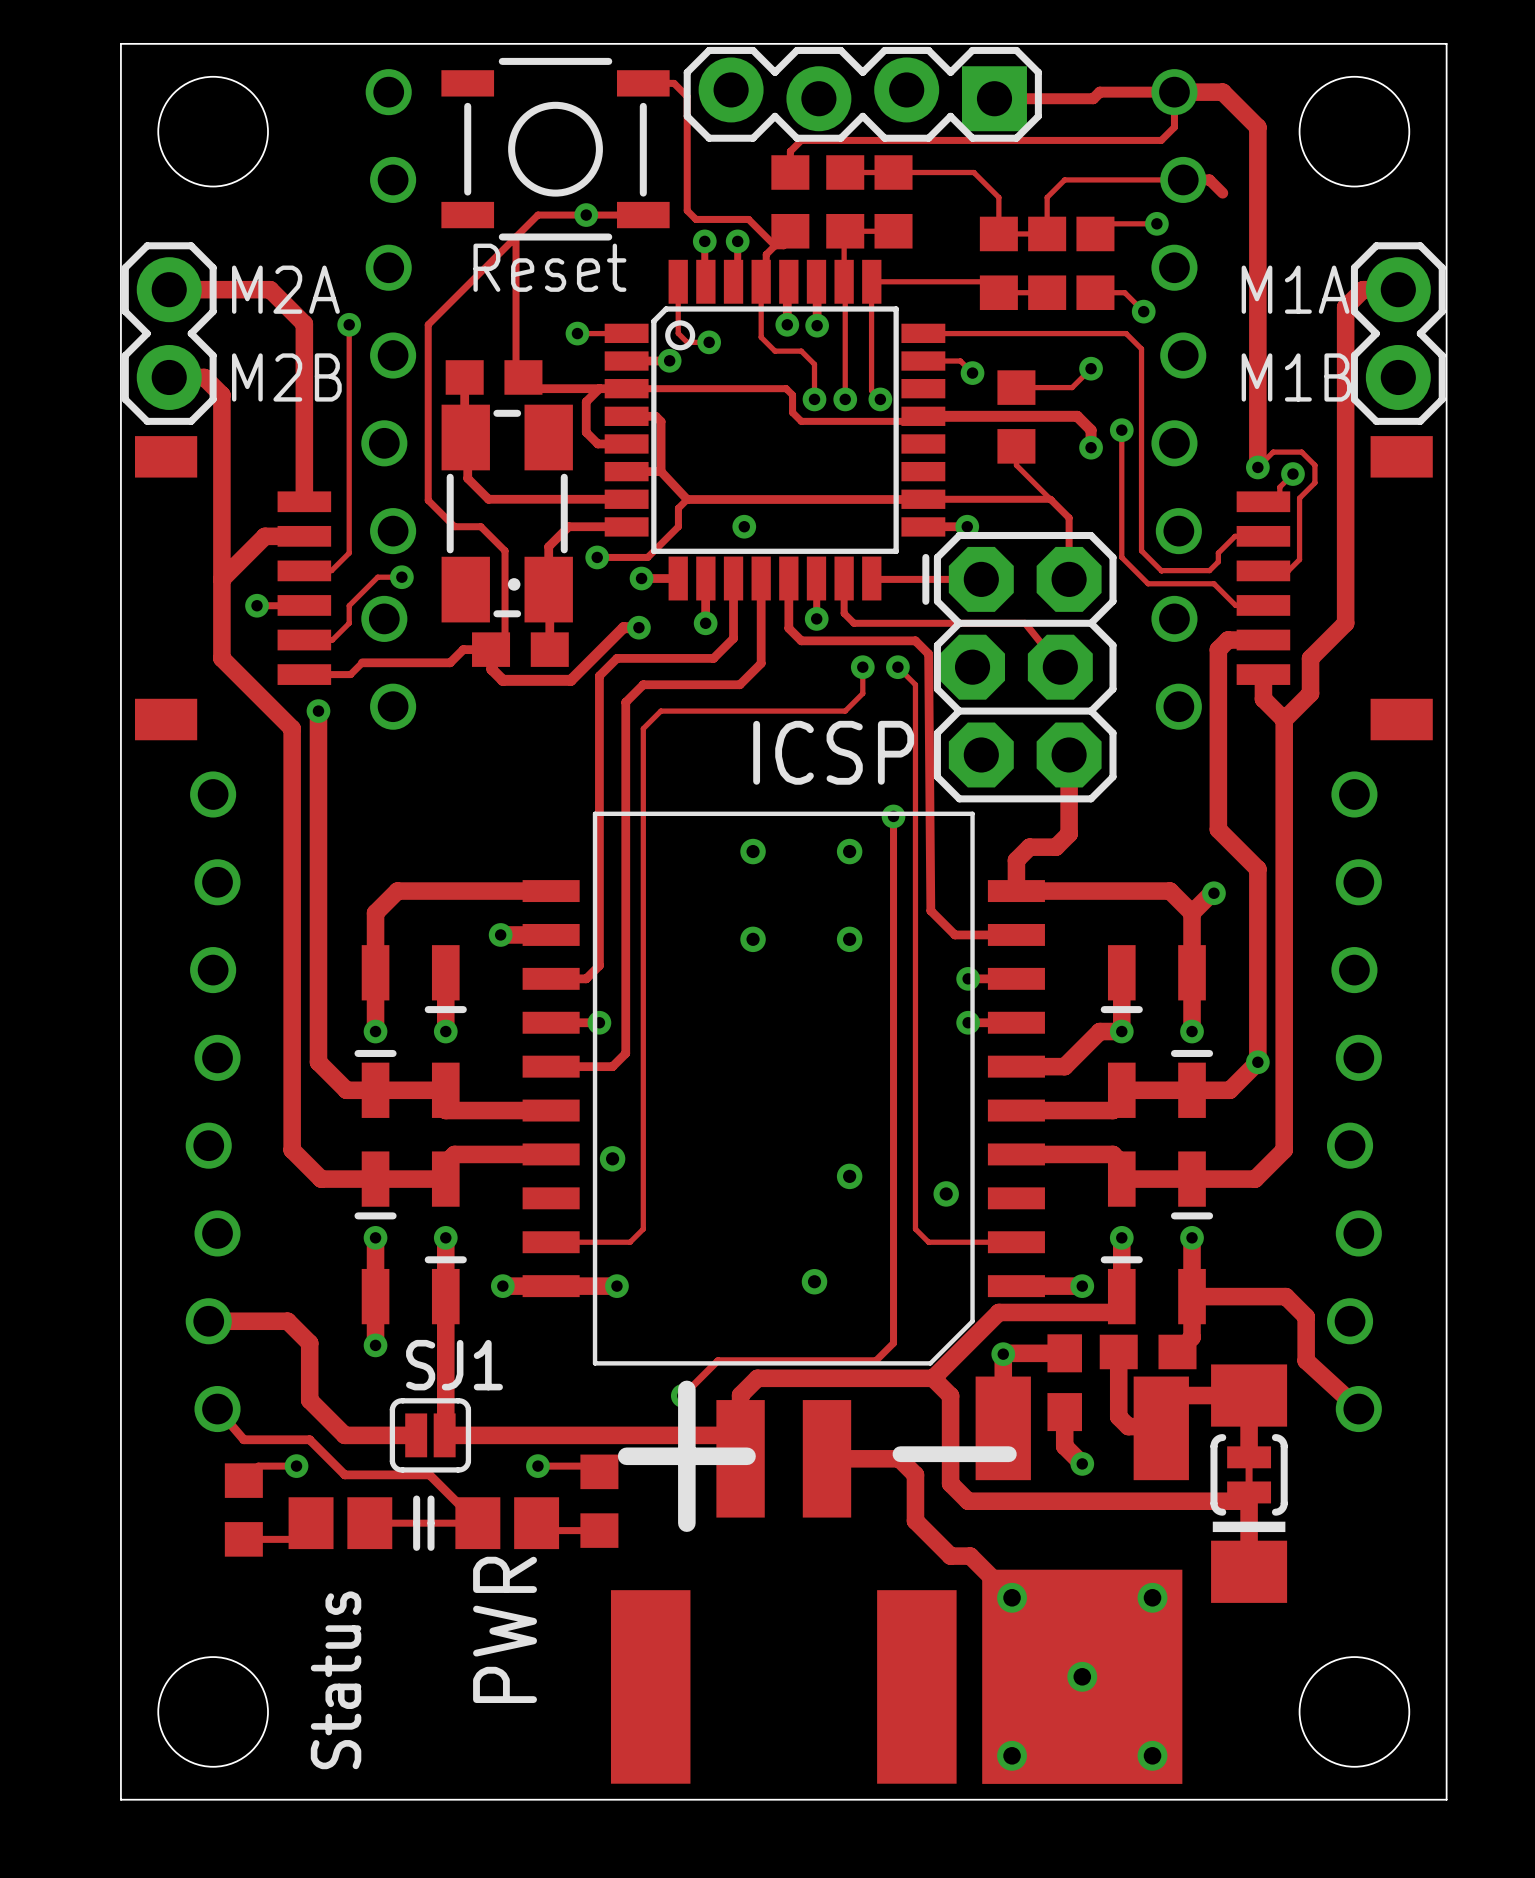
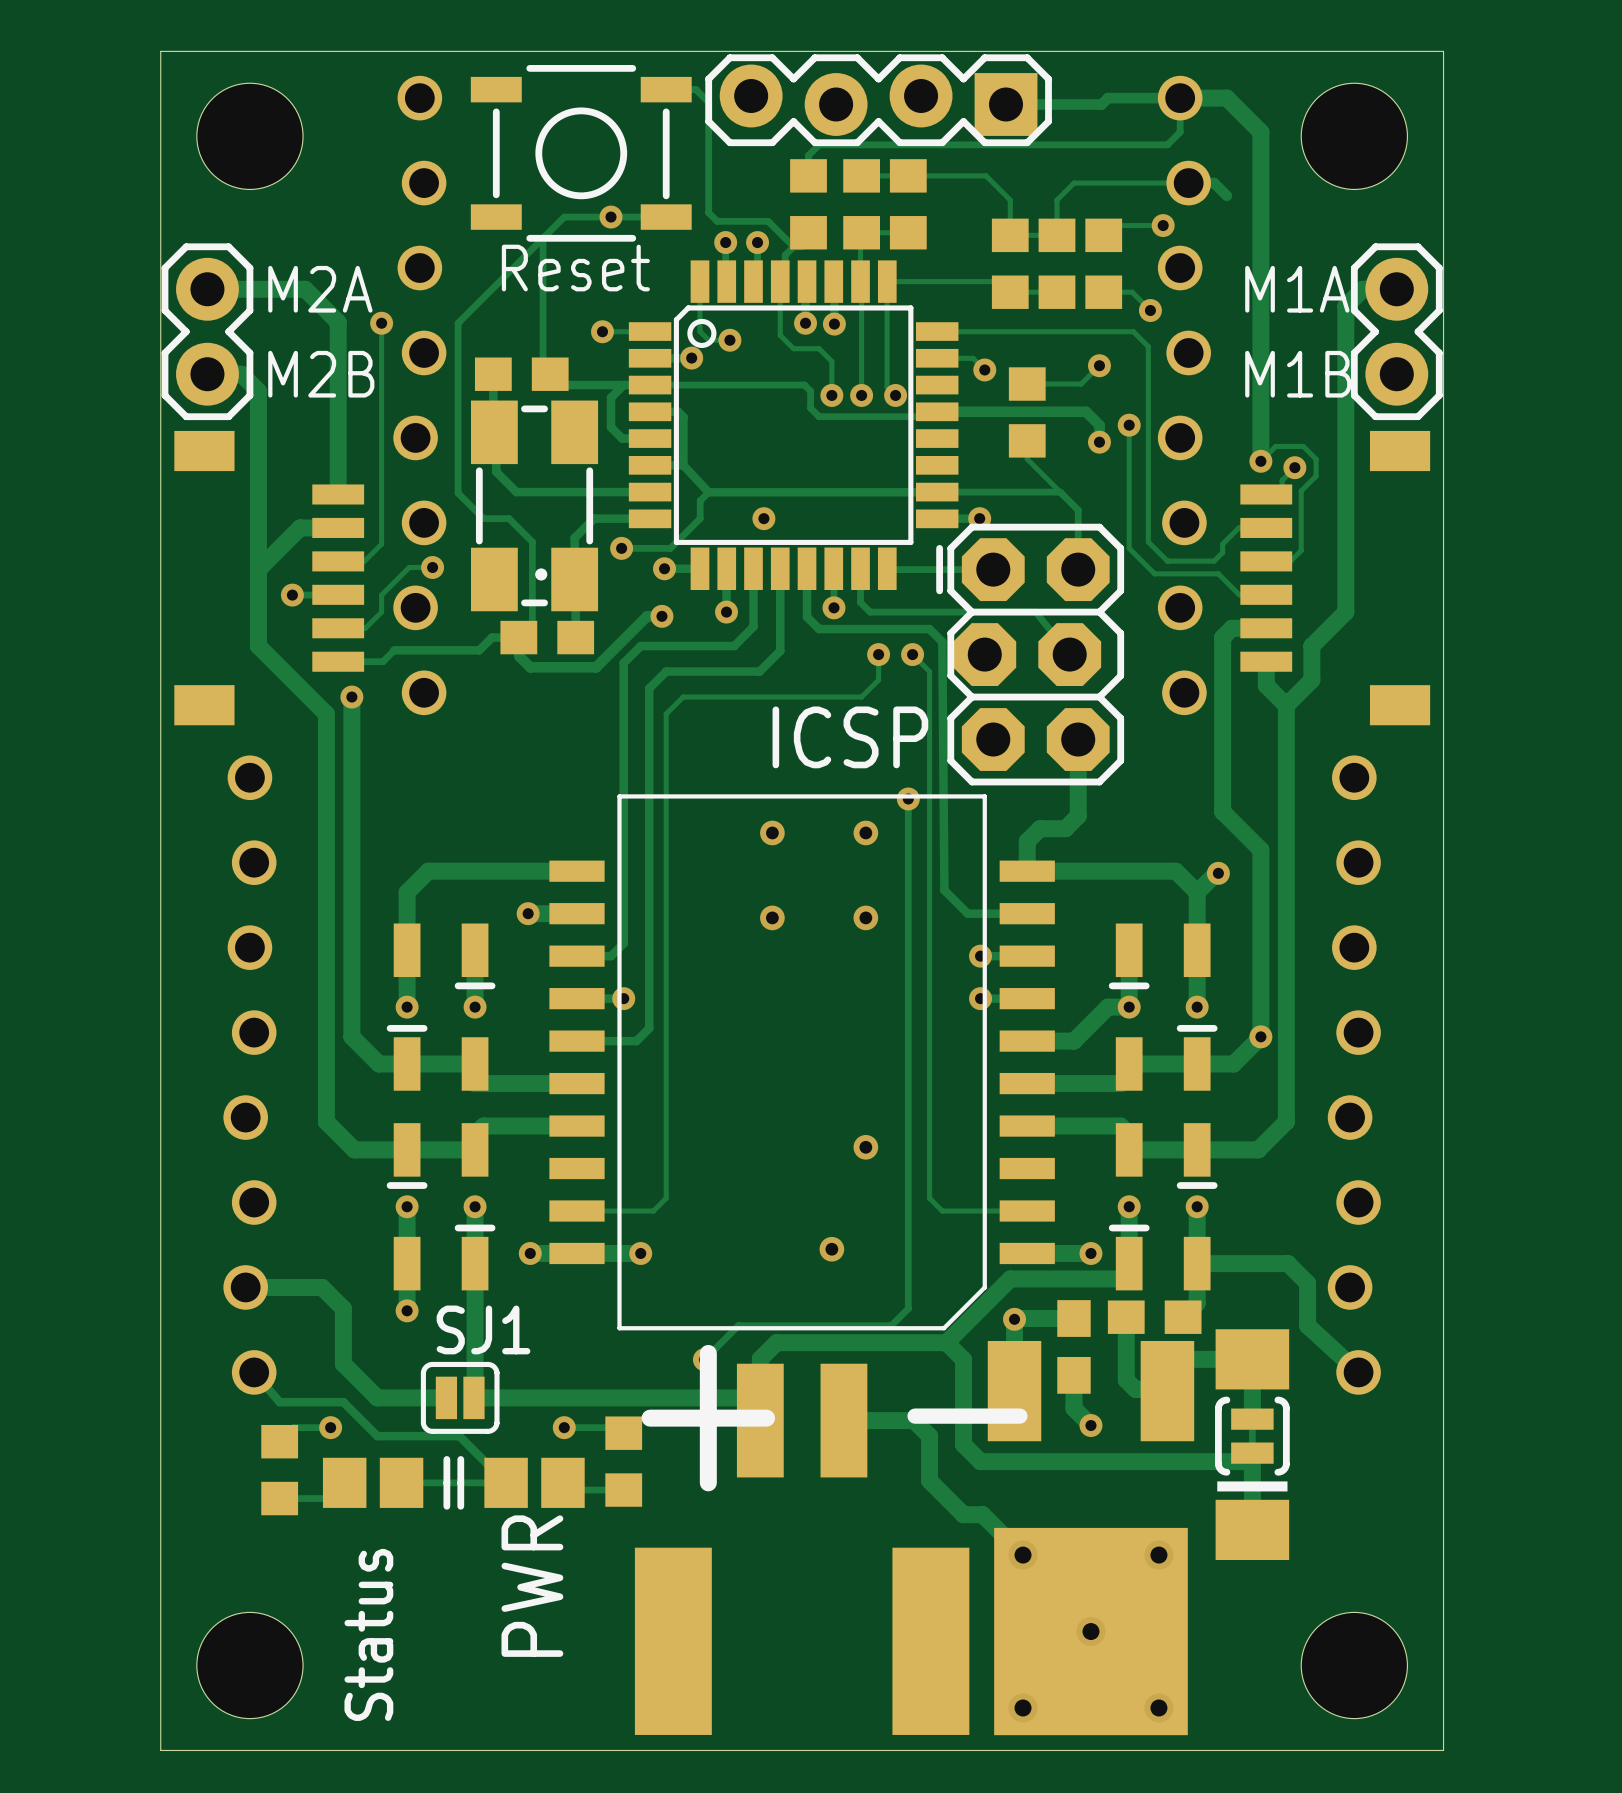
via: (612, 1158) -> none
via: (946, 1193) -> none

